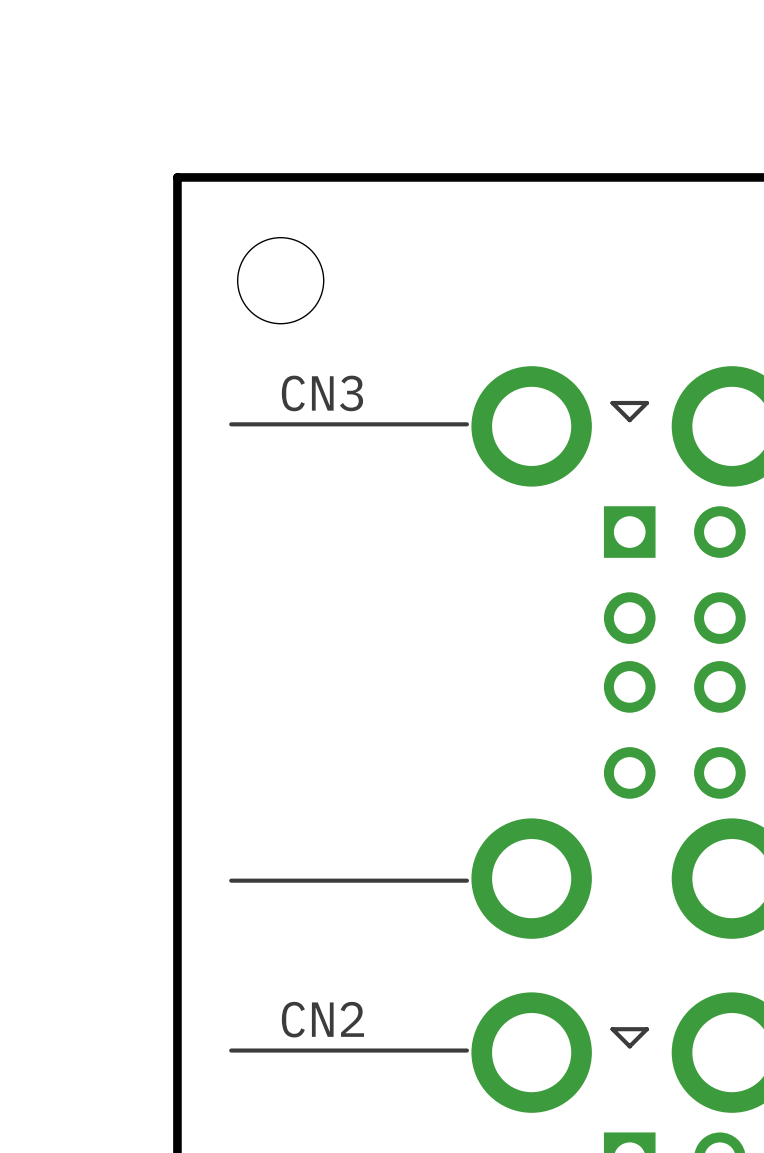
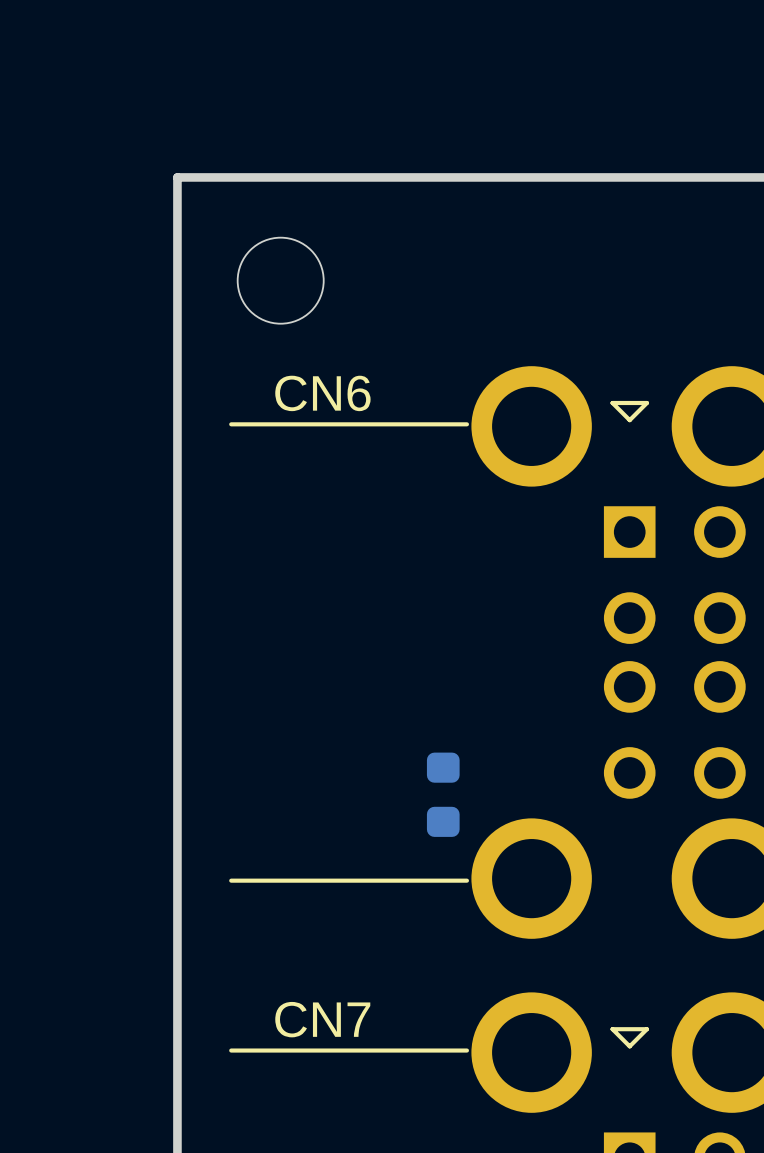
CN3 name: CN3 (322, 393) -> CN6 (322, 393)
part: none -> (443, 794)
CN2 name: CN2 (322, 1019) -> CN7 (322, 1019)

